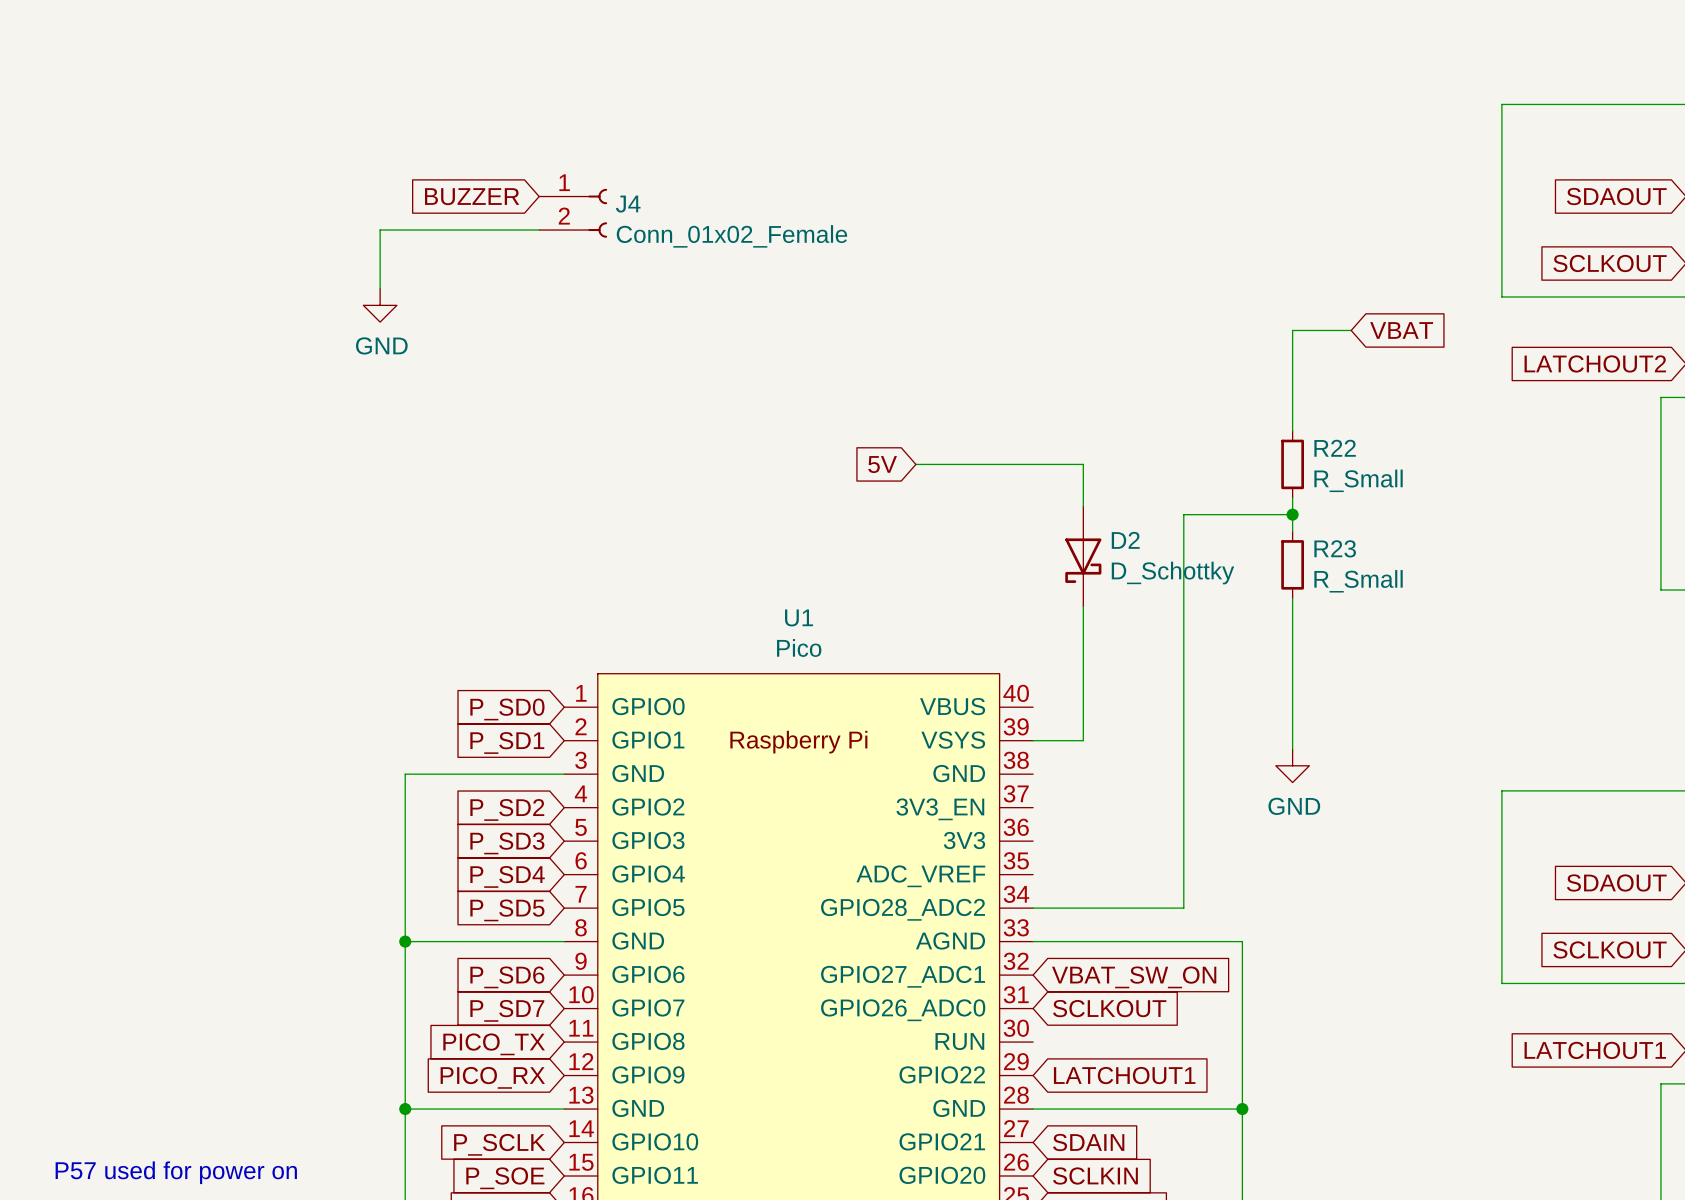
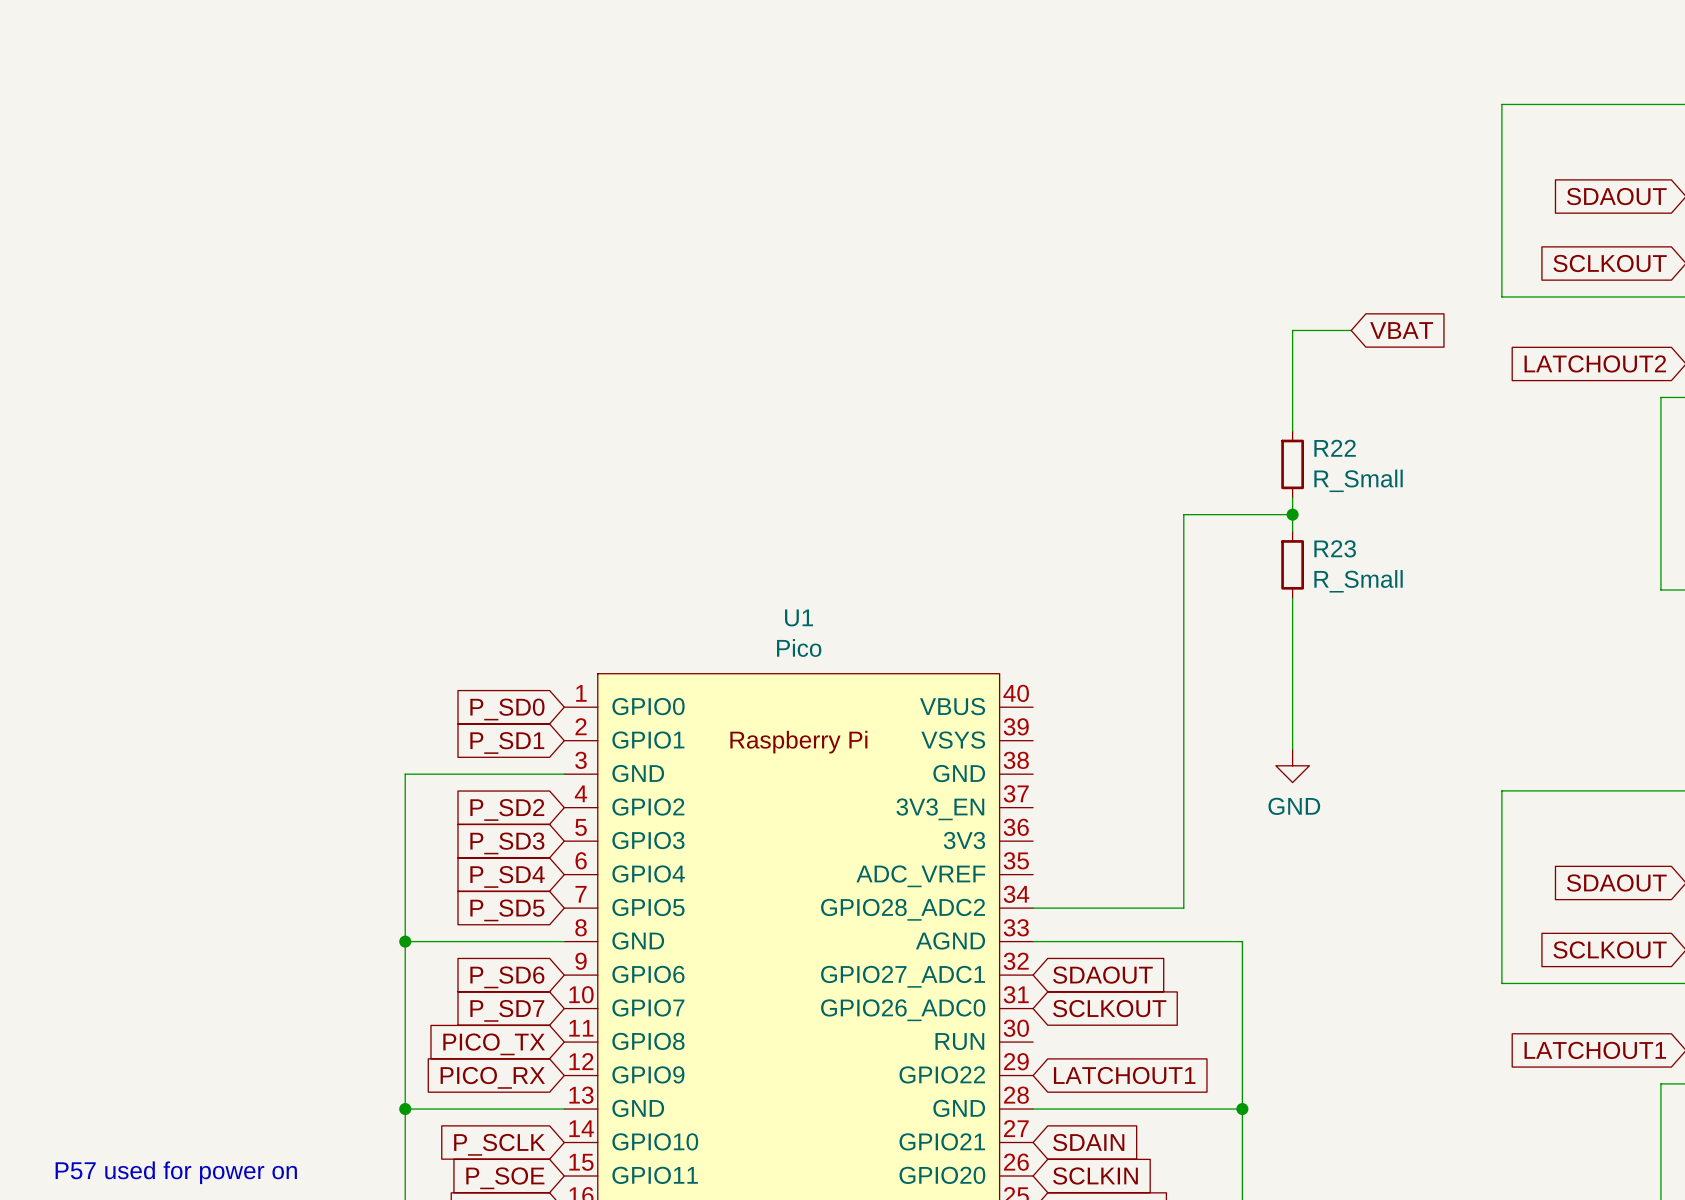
global label: BUZZER (472, 196) -> none
J4: Conn_01x02_Female (573, 213) -> none
wire: (539, 230) (380, 230) (380, 288) -> none
power symbol: GND (380, 305) -> none
global label: 5V (882, 464) -> none
wire: (915, 464) (1083, 464) (1083, 506) -> none
D2: D_Schottky (1083, 556) -> none
wire: (1083, 606) (1083, 740) (1033, 740) -> none
global label: VBAT_SW_ON (1134, 977) -> SDAOUT (1102, 975)

